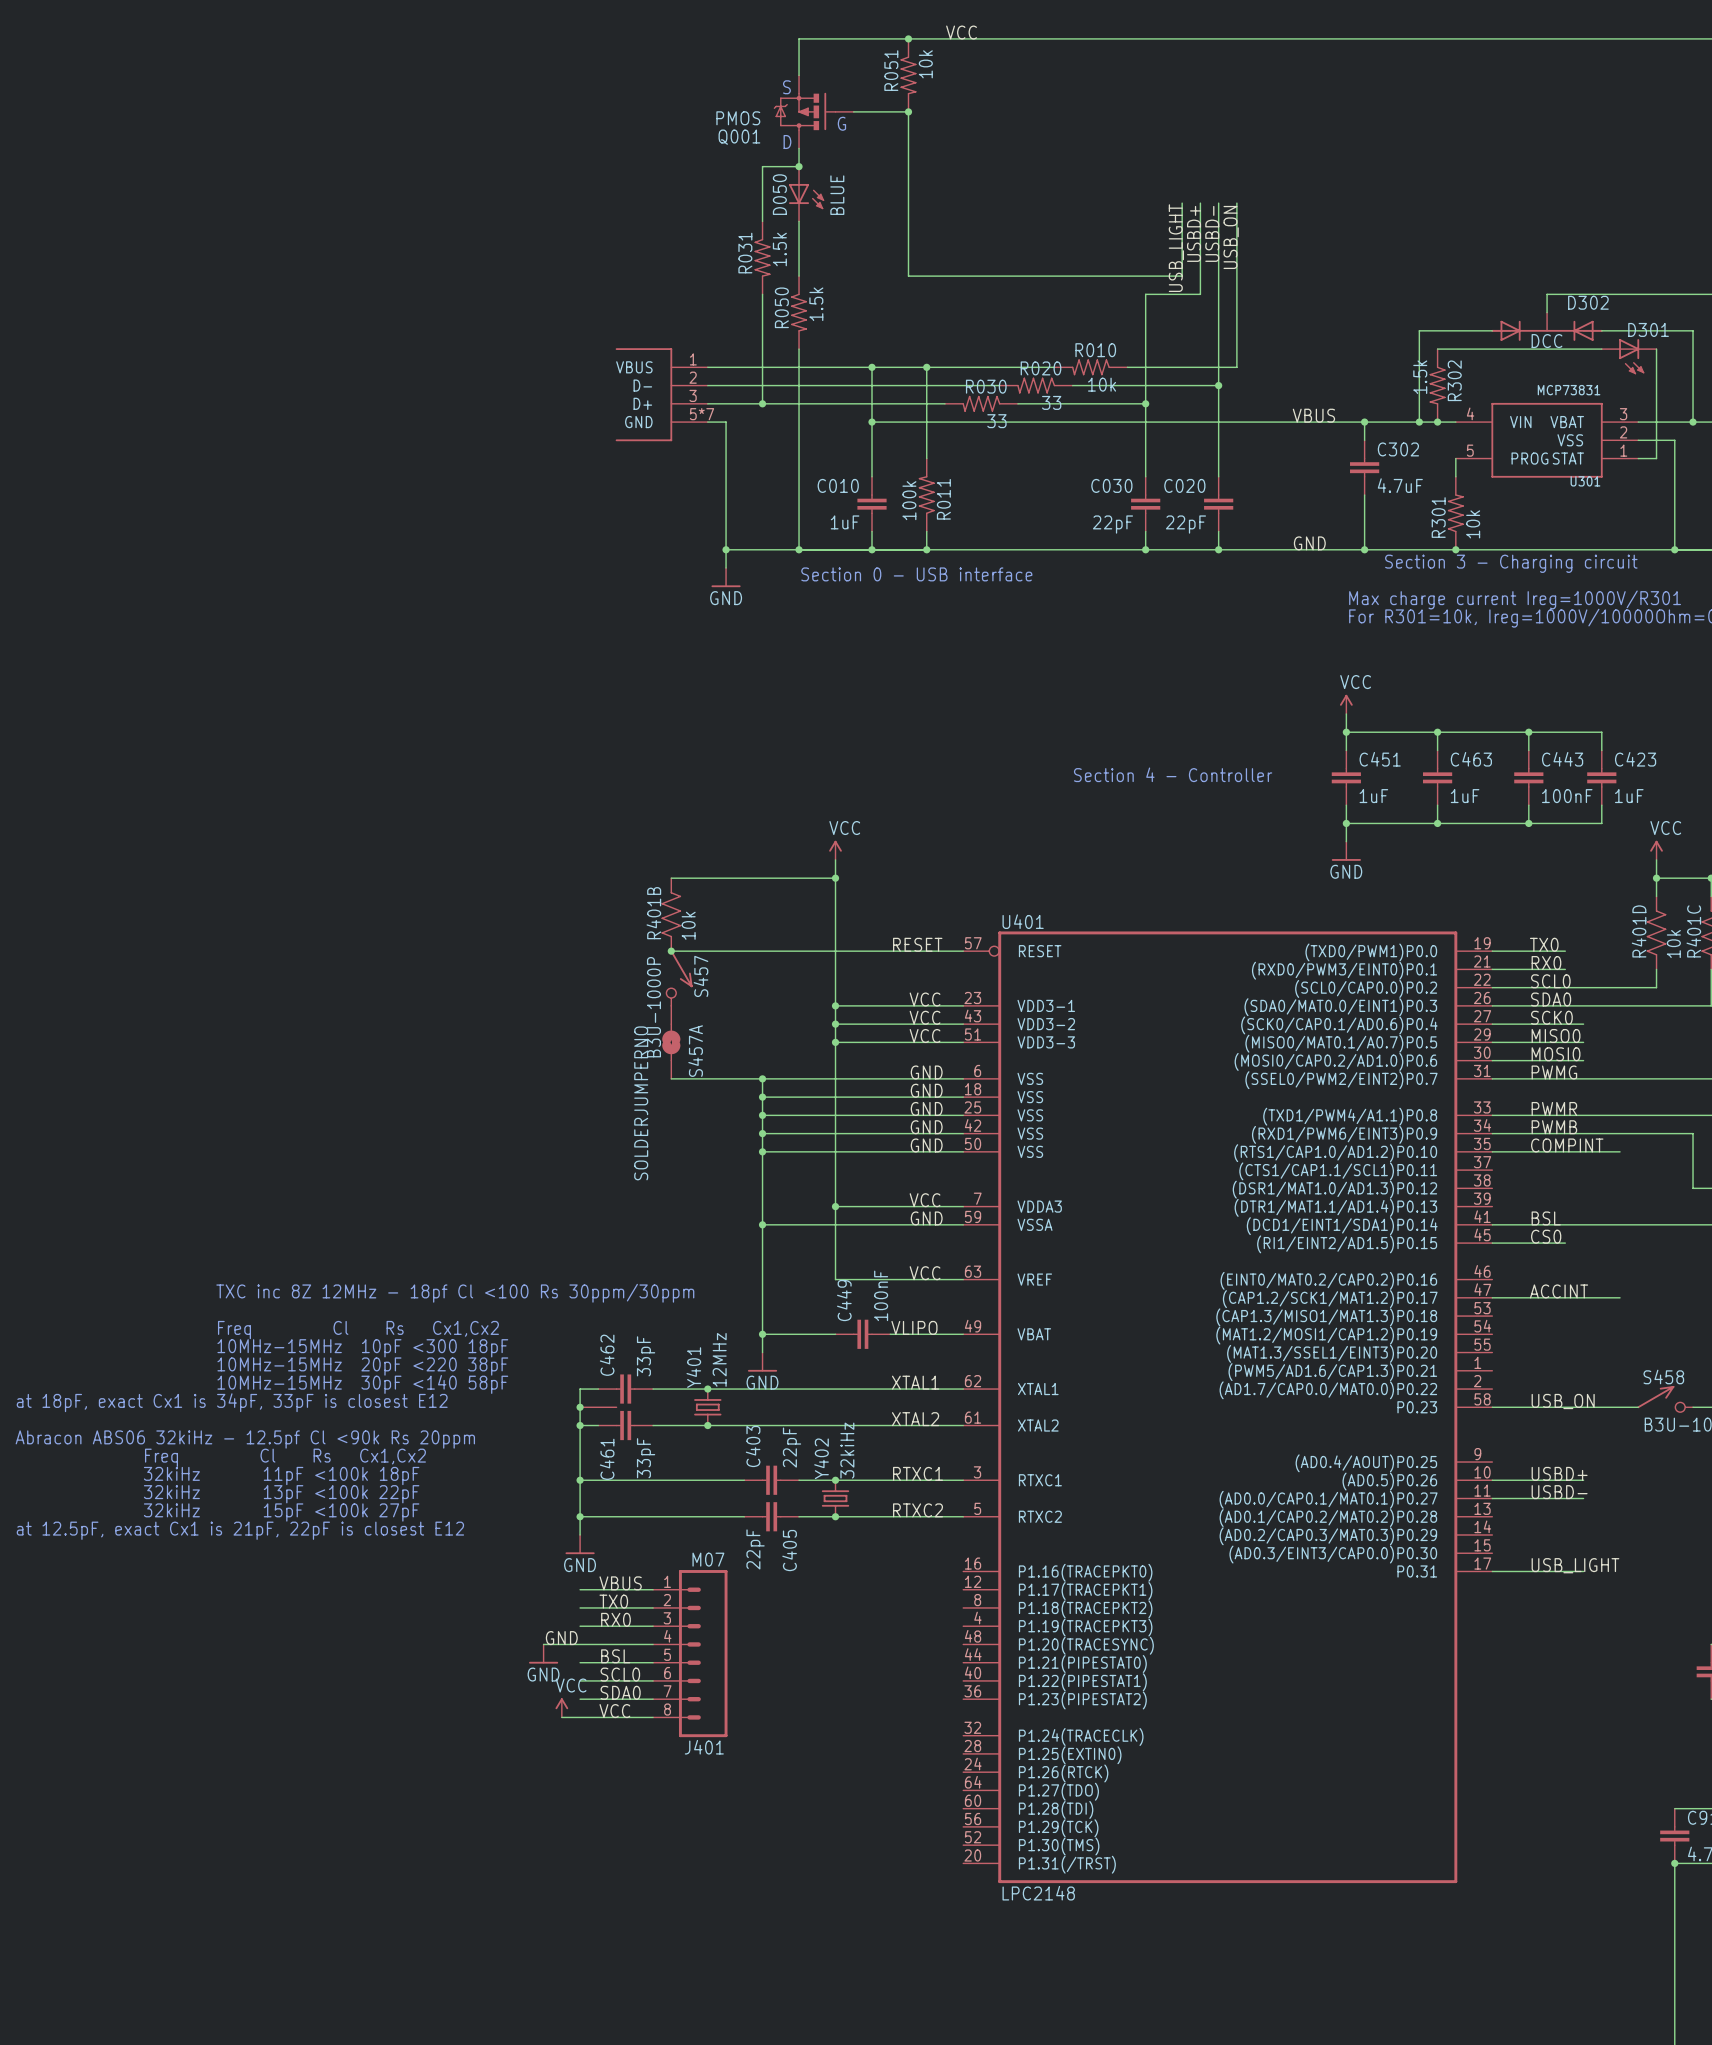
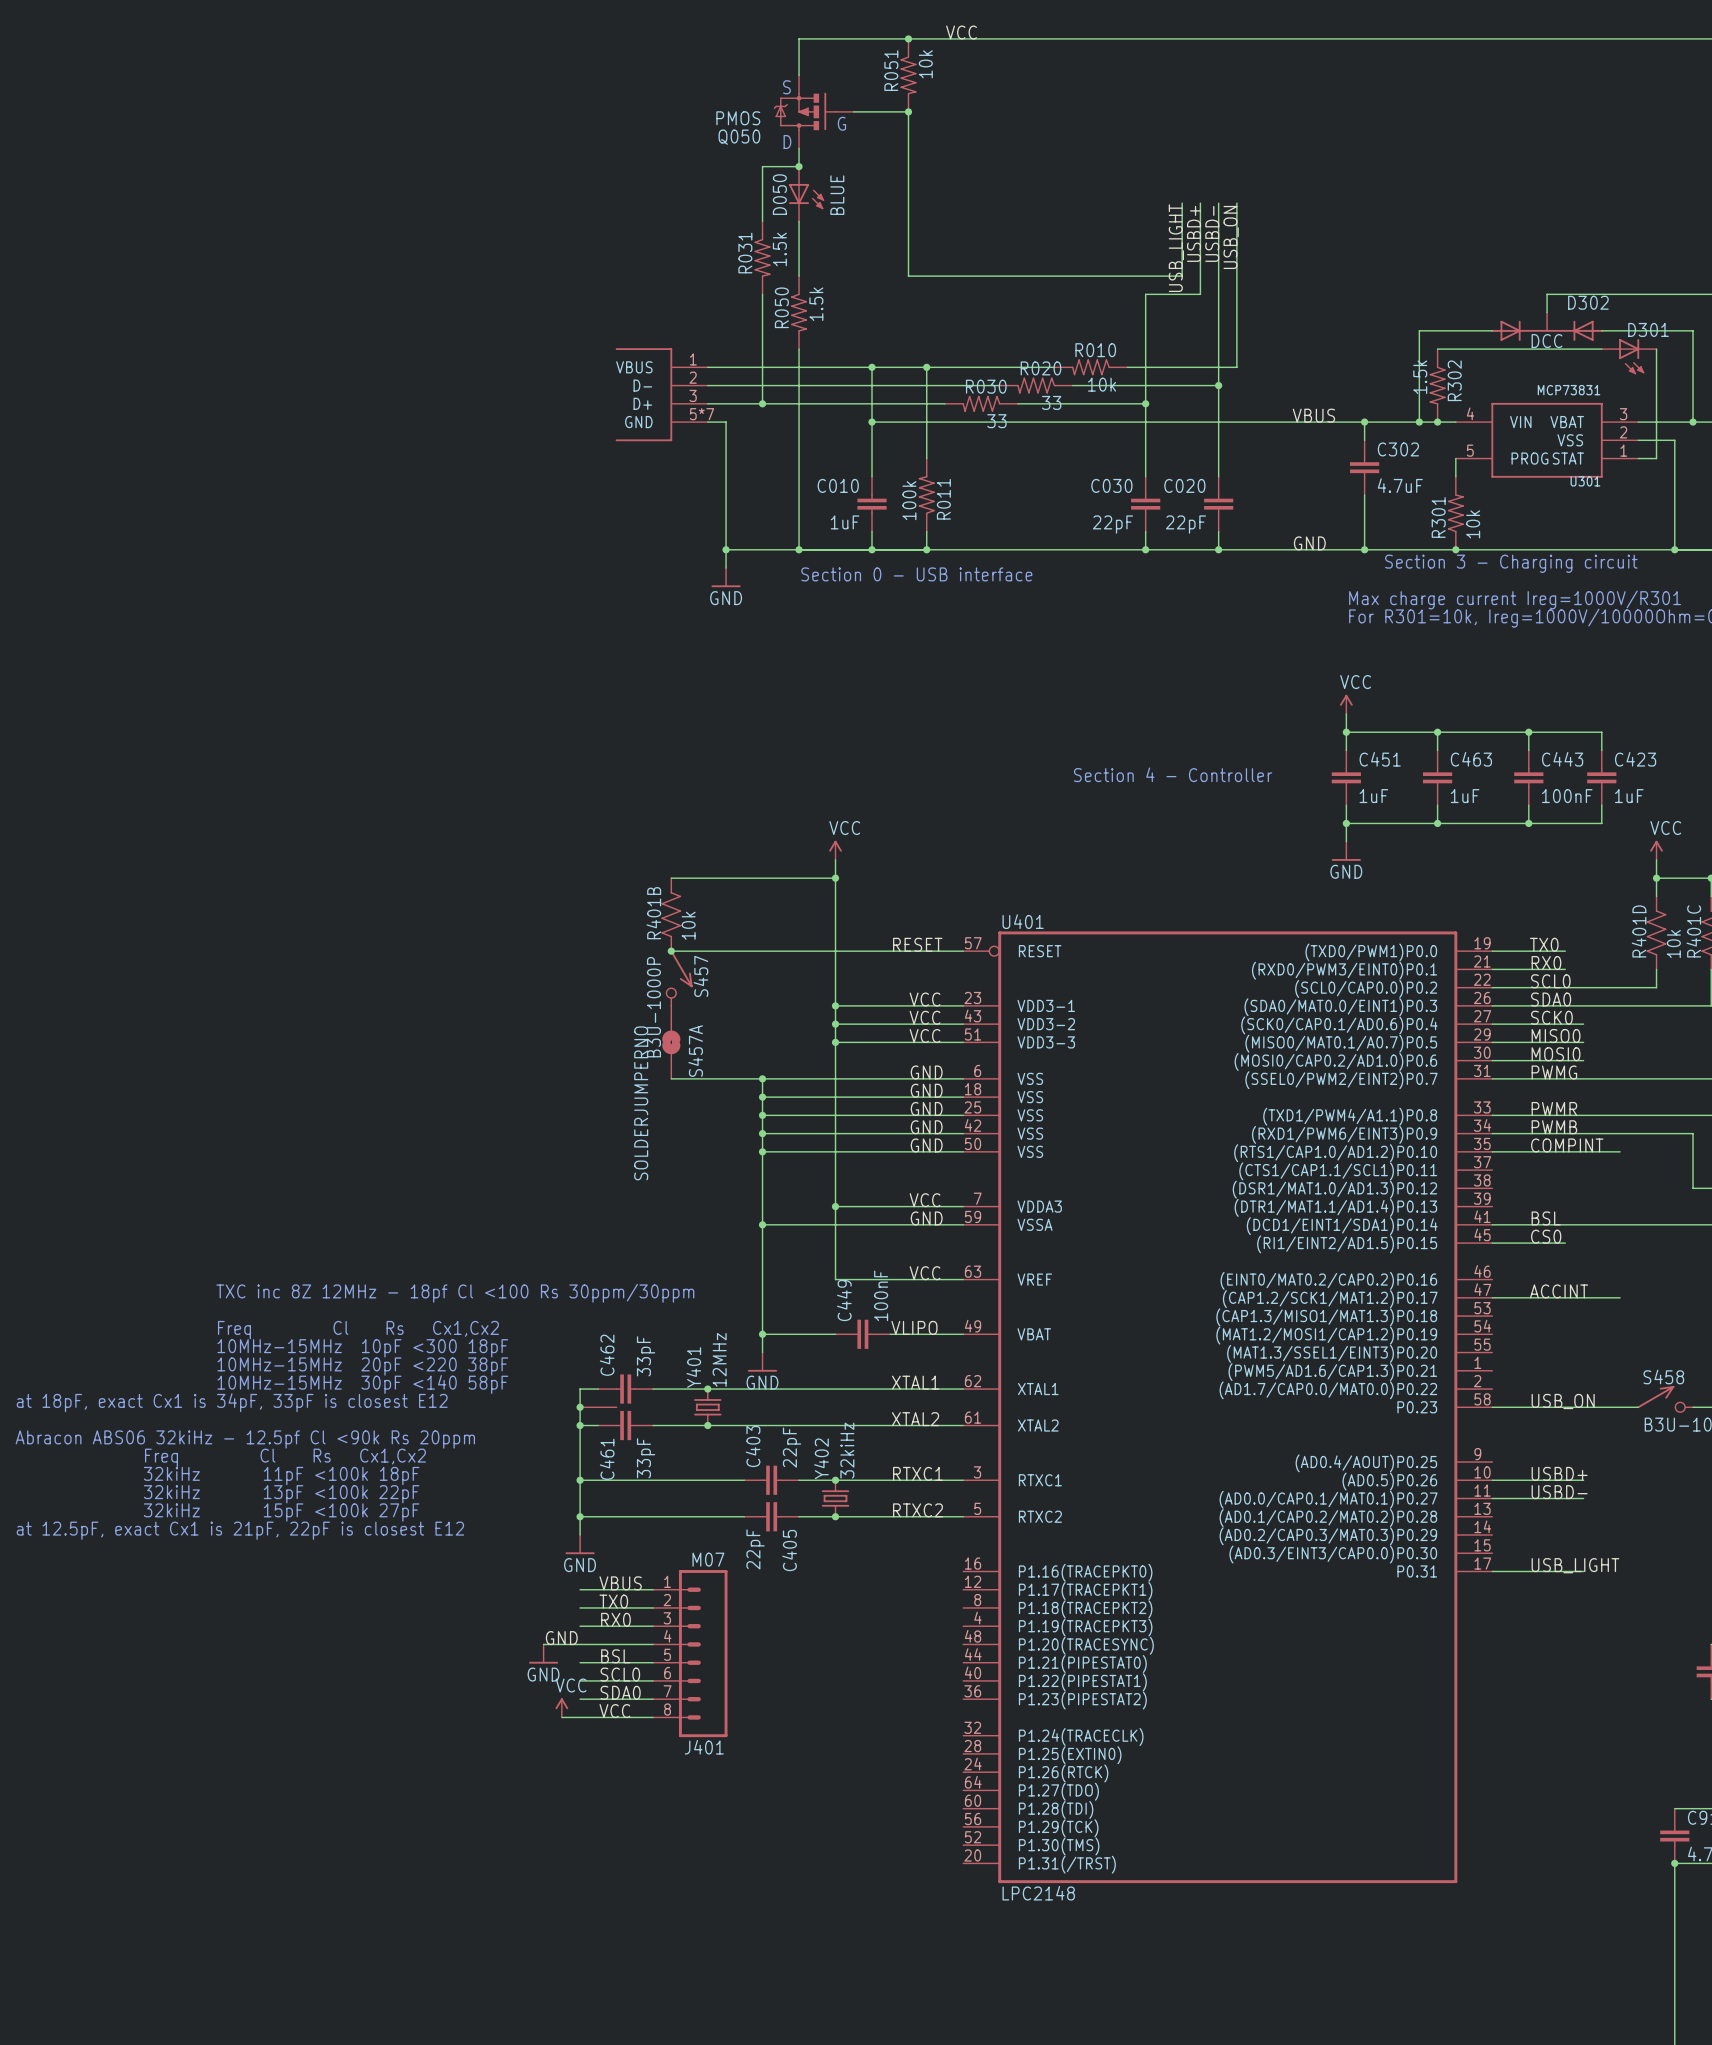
Q001 name: Q001 (739, 137) -> Q050 (739, 137)

